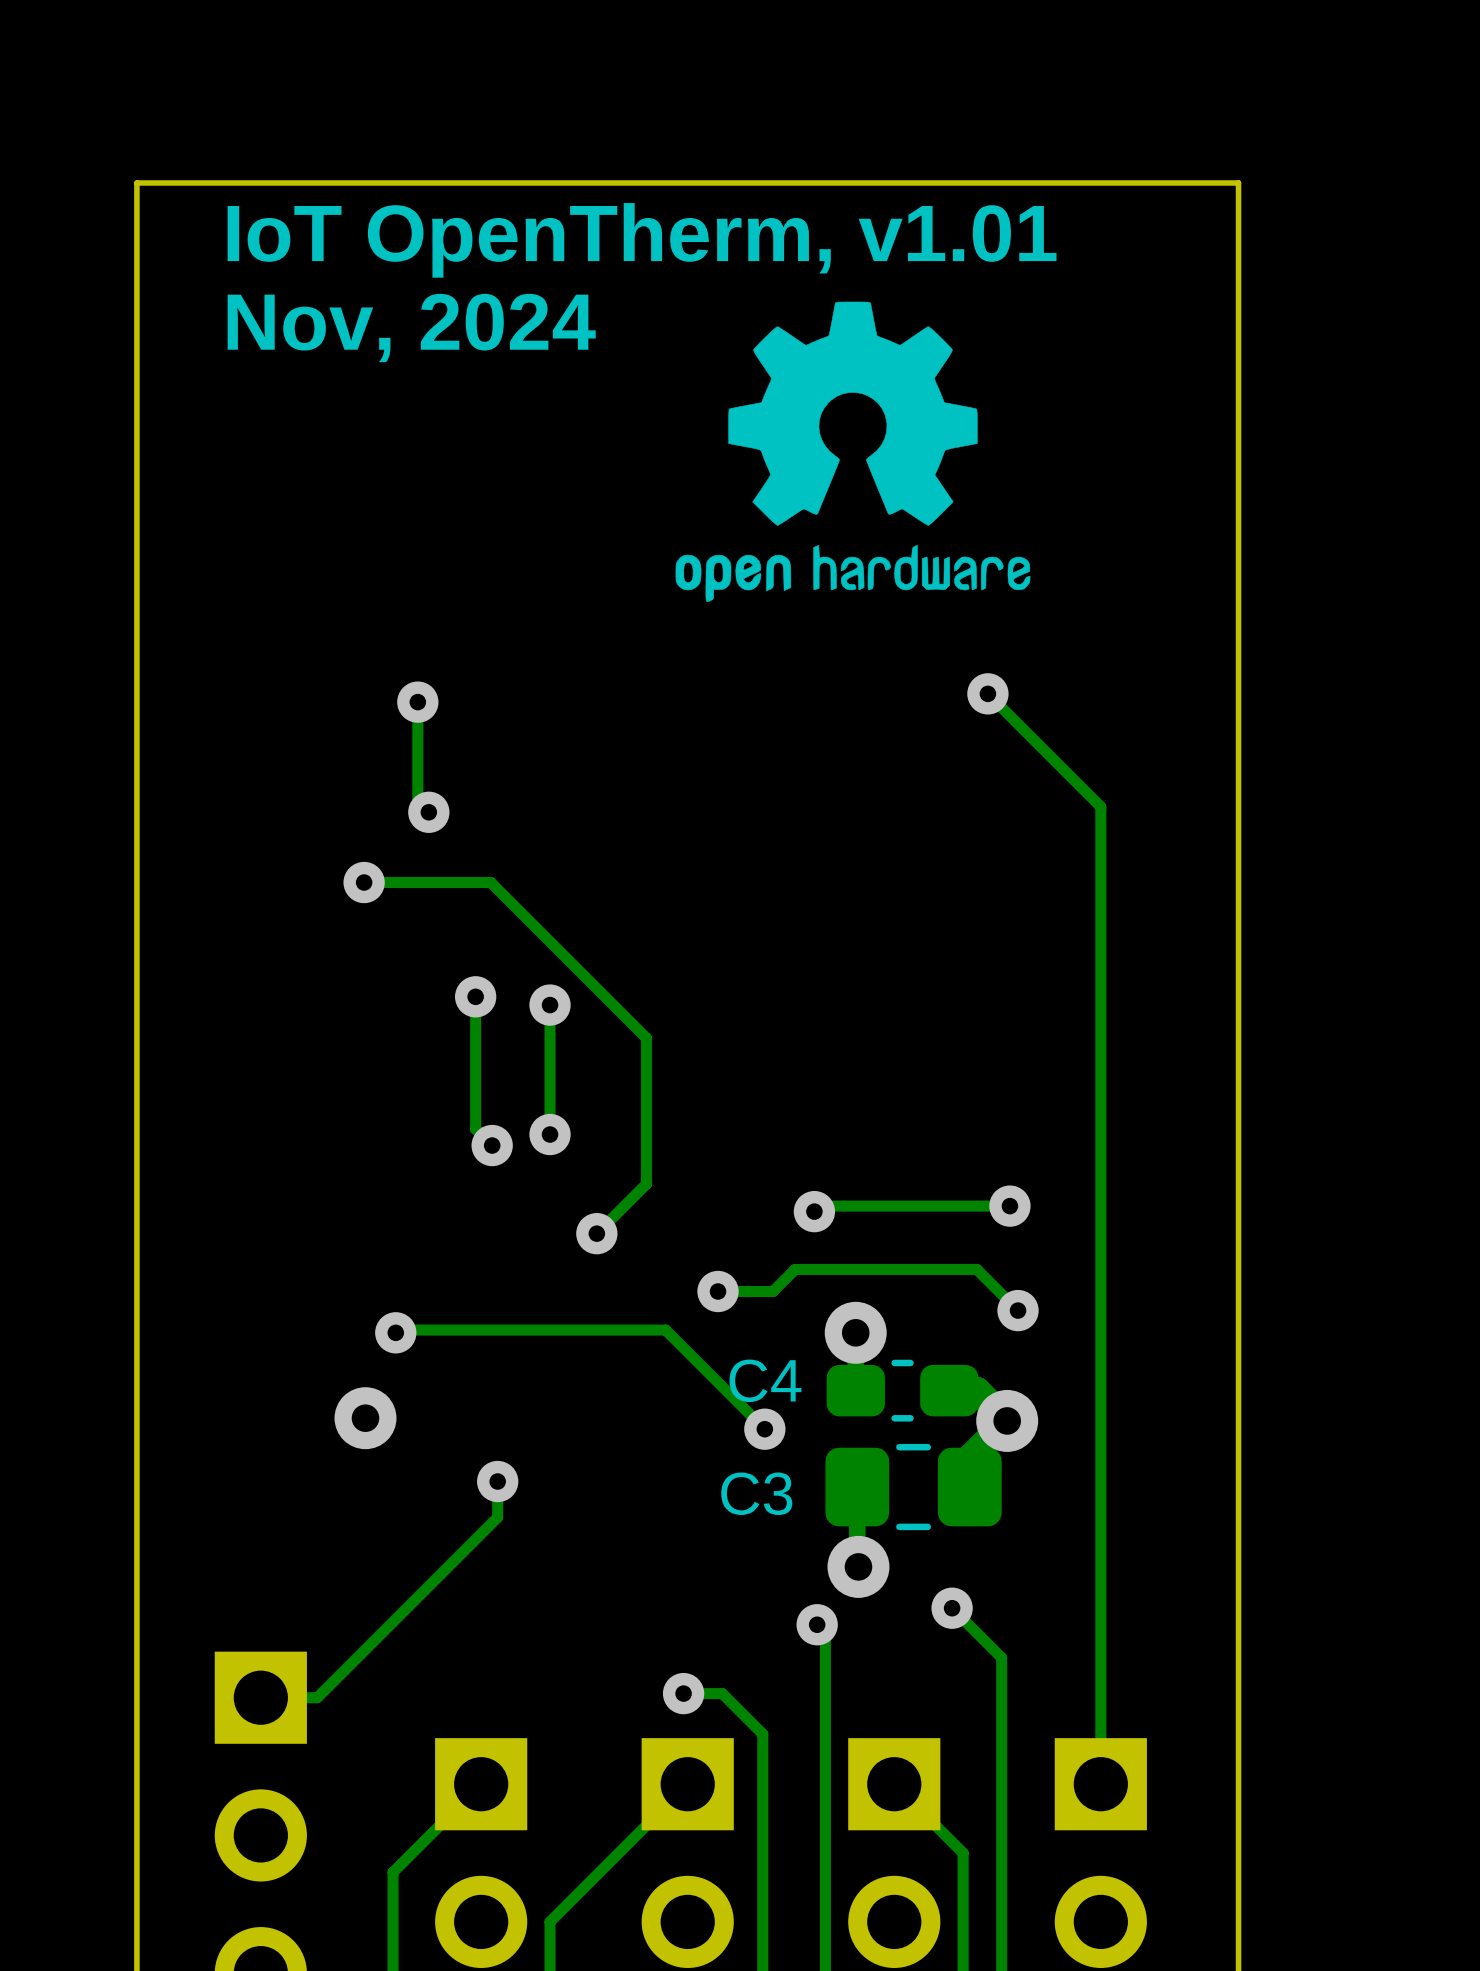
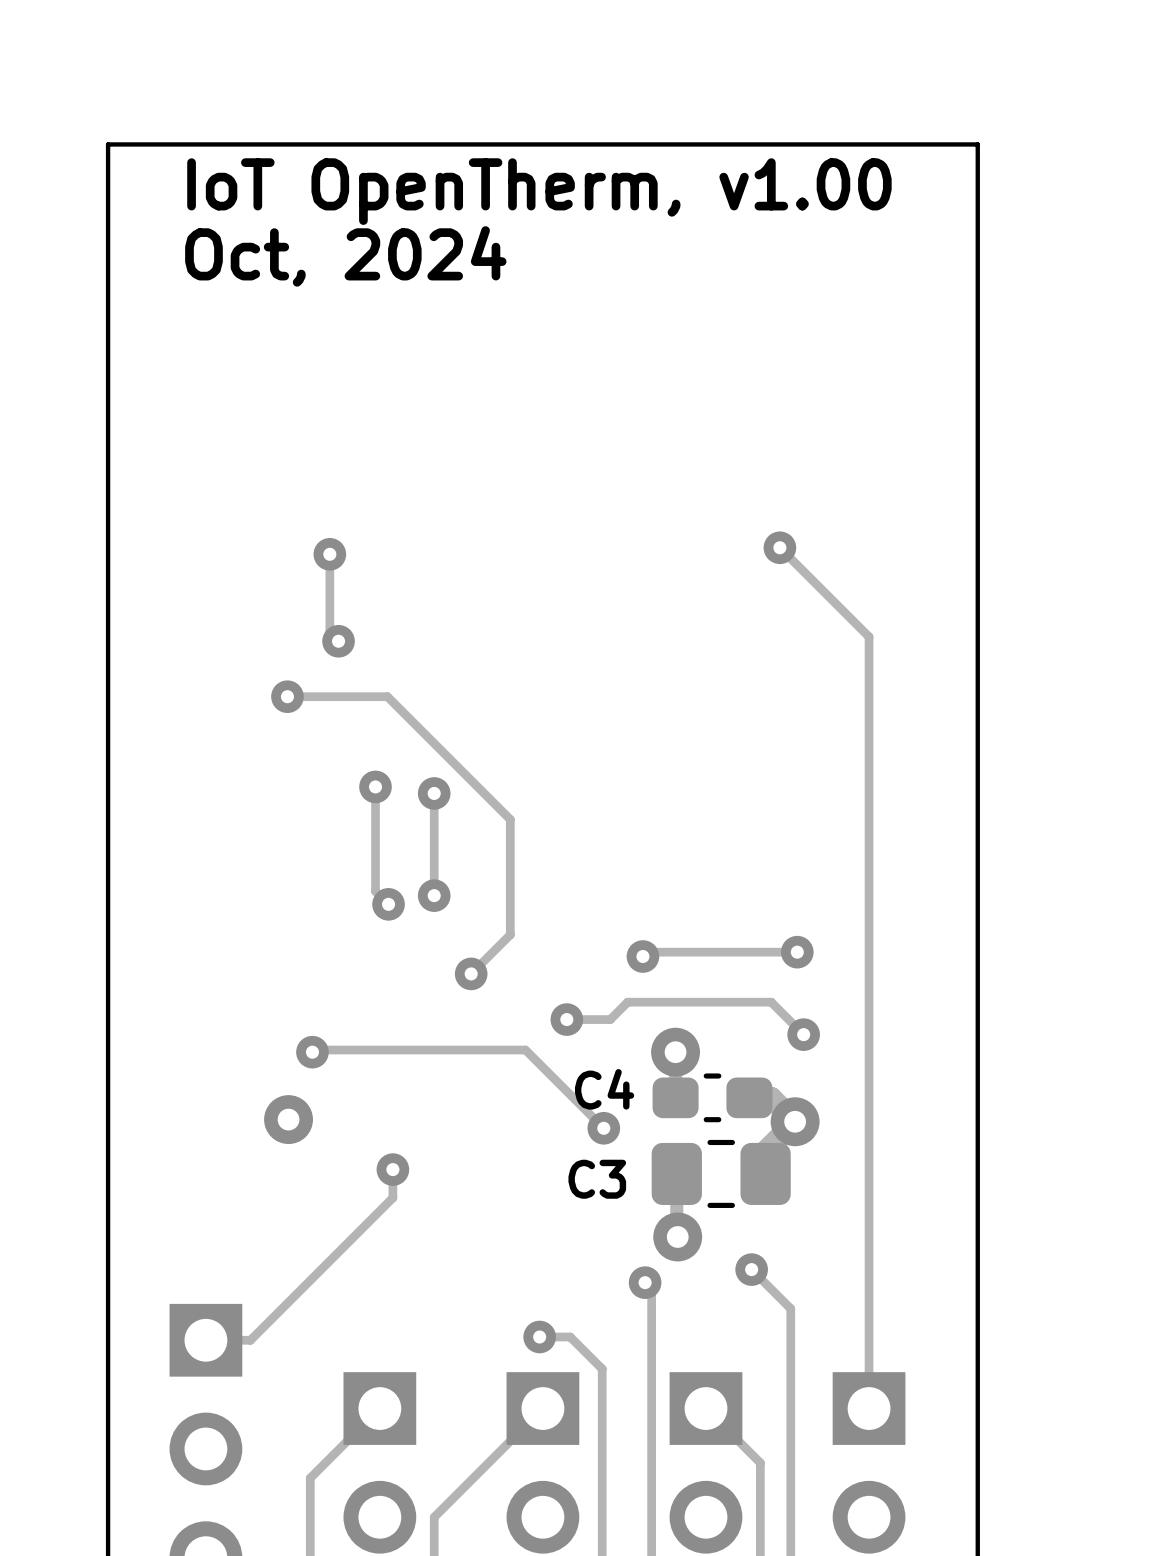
text: IoT OpenTherm, v1.01 (642, 240) -> IoT OpenTherm, v1.00 (539, 191)
drawing: [675, 301, 1031, 603] -> none
text: Nov, 2024 (411, 327) -> Oct, 2024 (345, 256)

